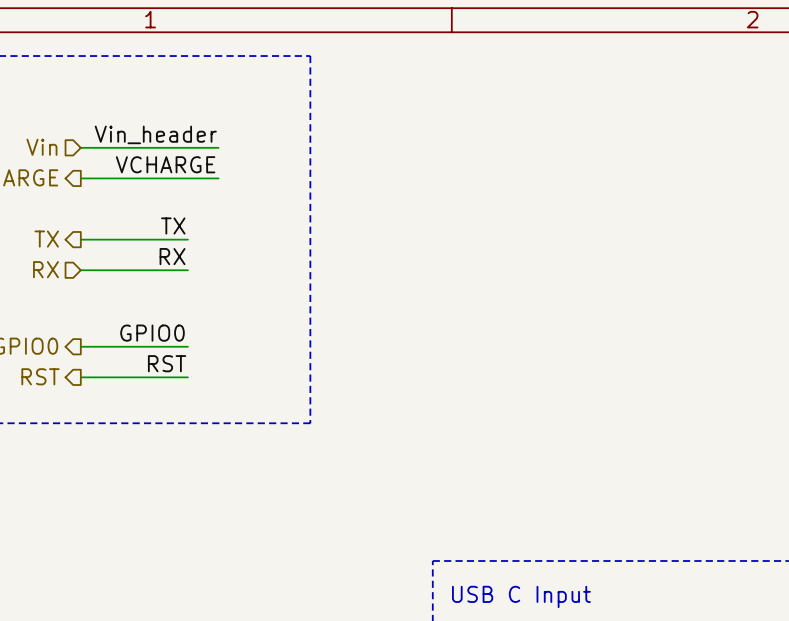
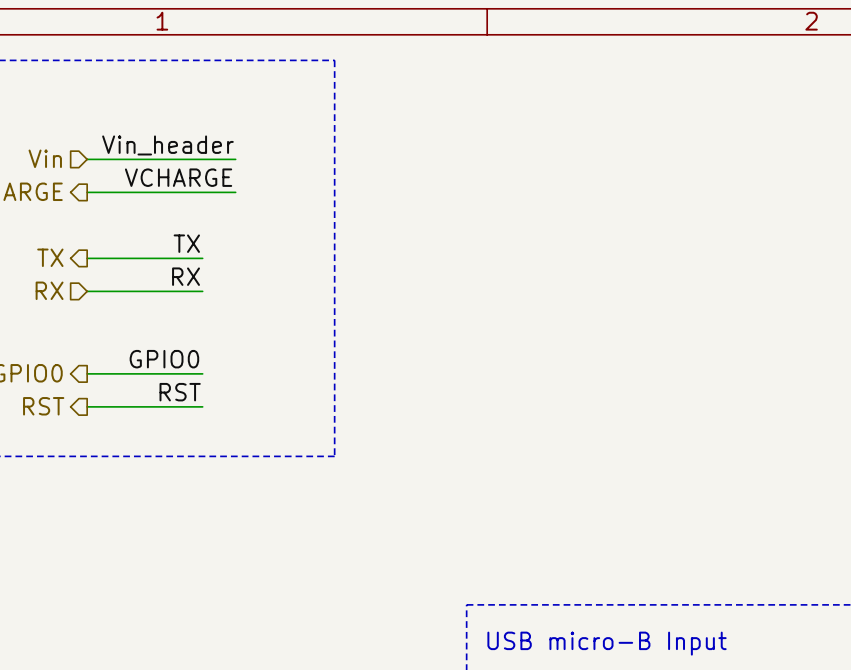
text: USB C Input (521, 596) -> USB micro-B Input (607, 643)

